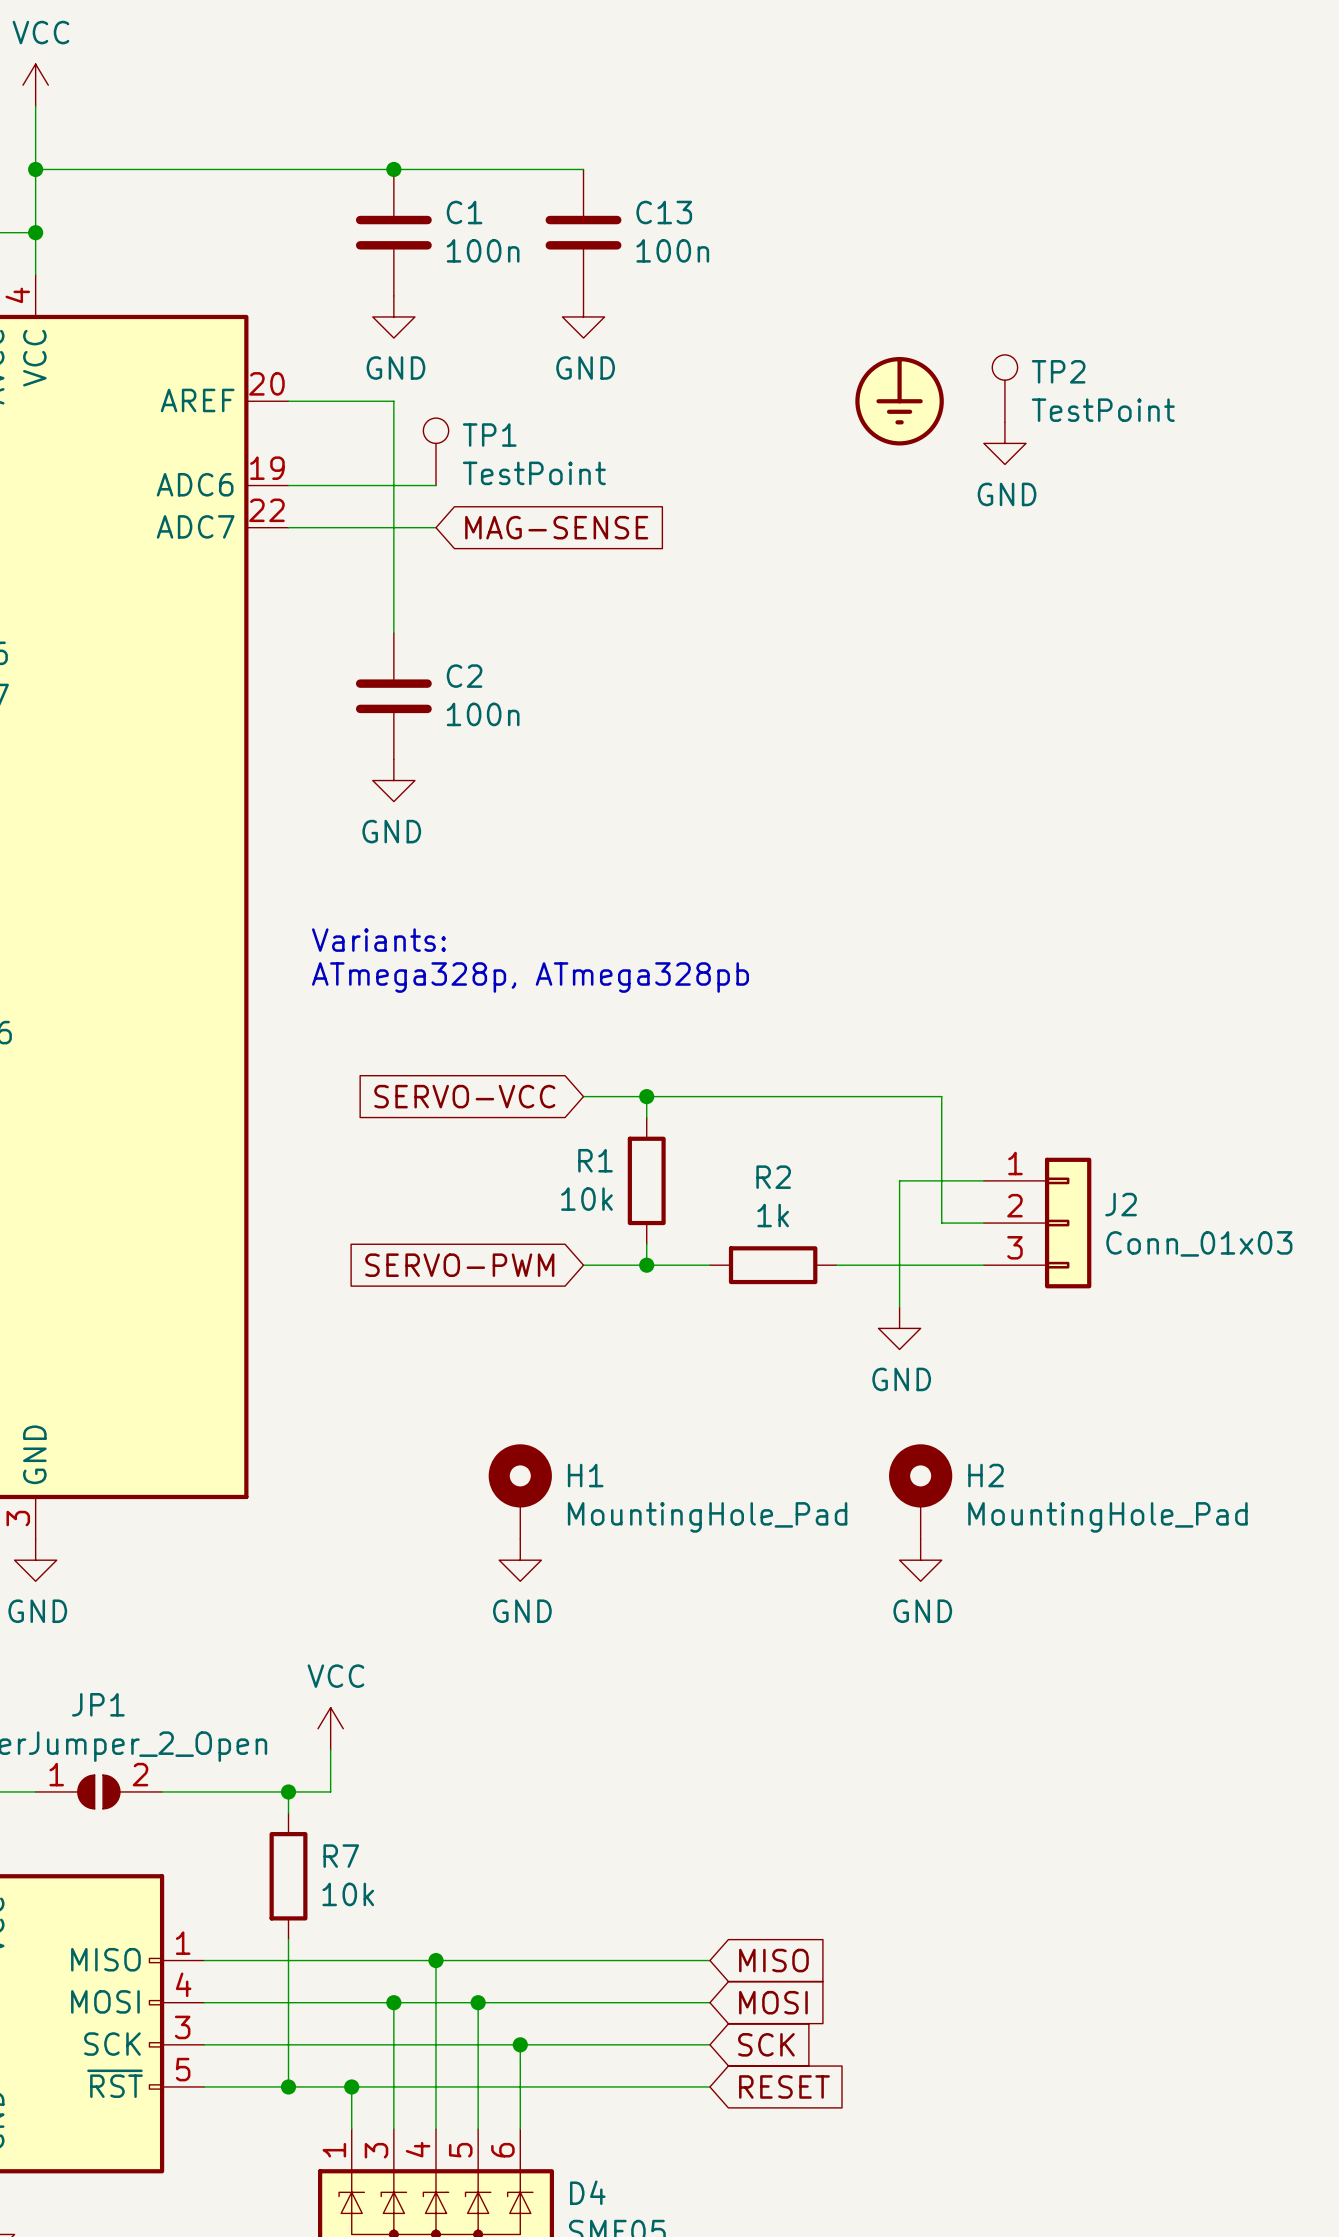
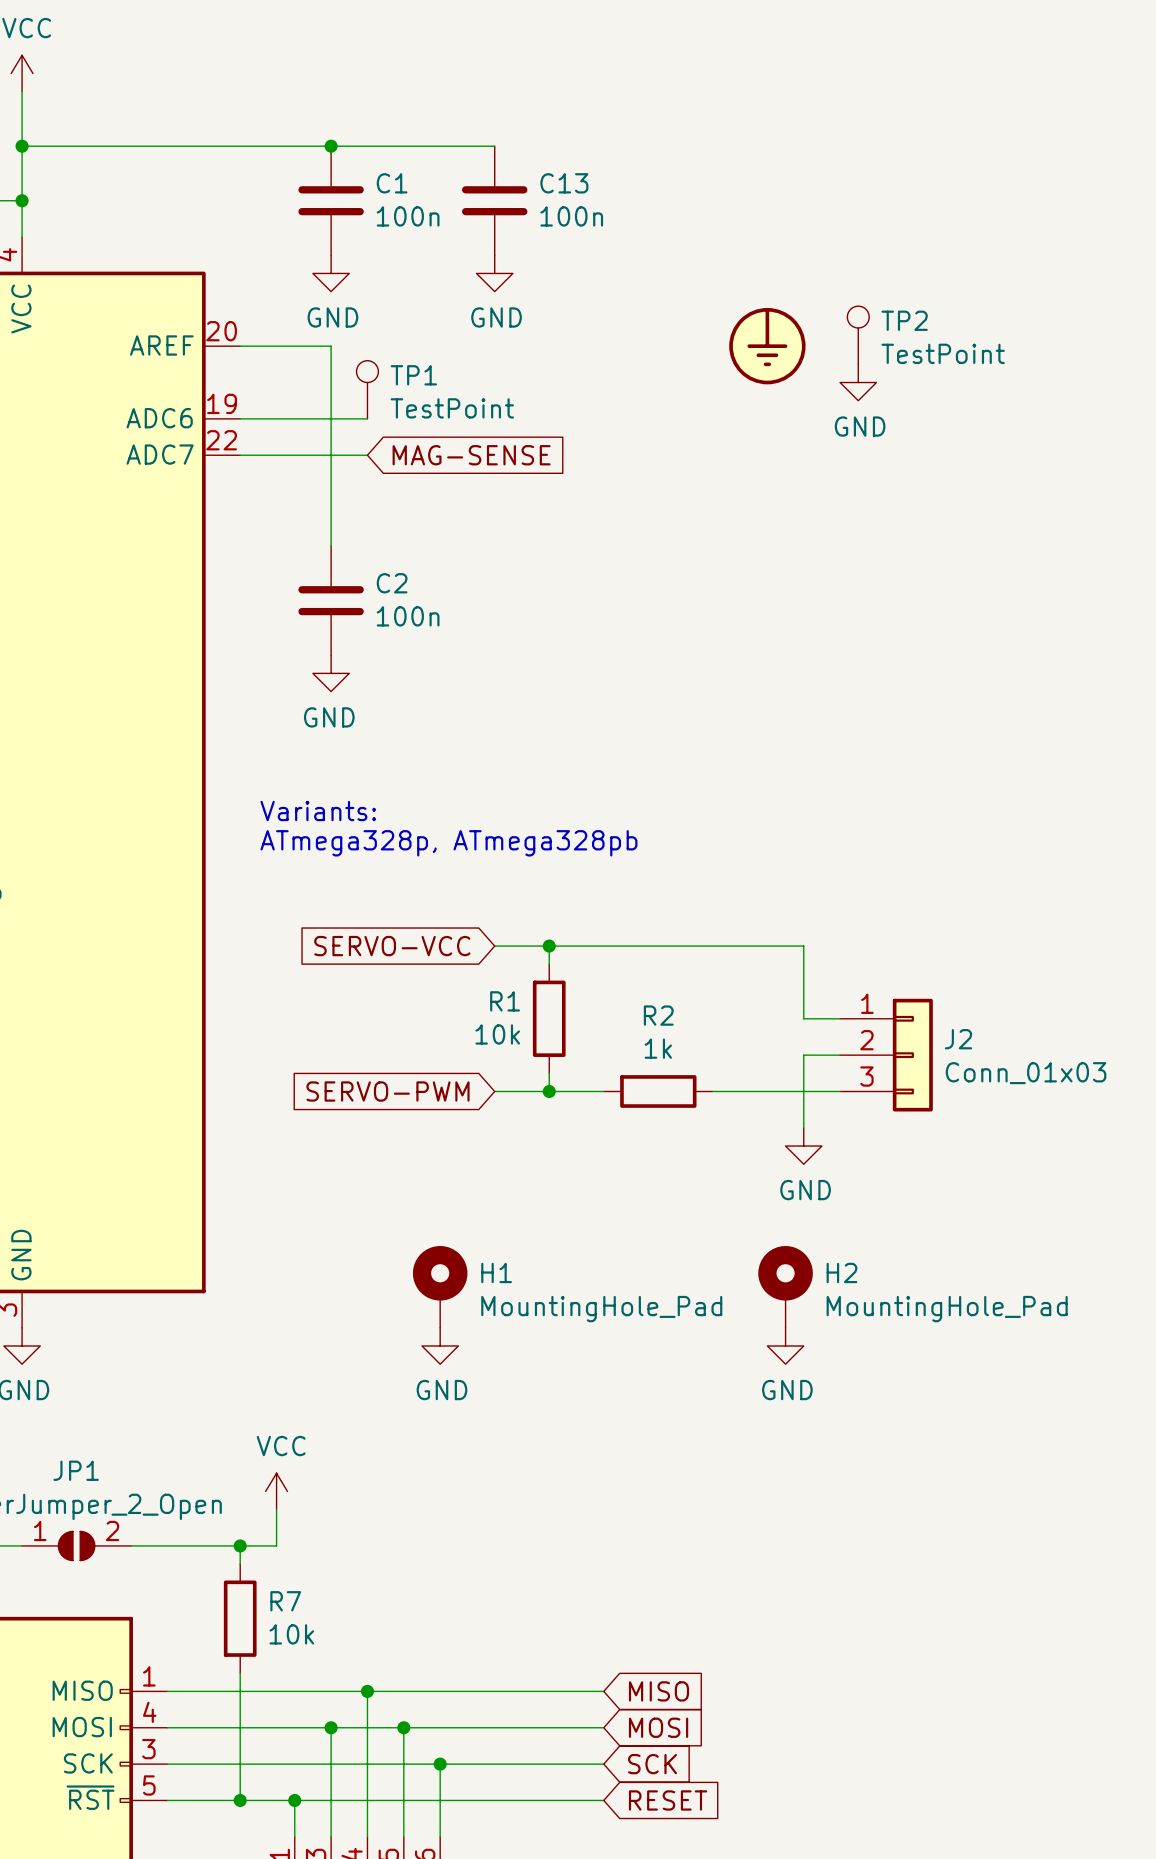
wire: (941, 1223) (941, 1180) (899, 1180) (899, 1307) -> (803, 1055) (803, 1127)
power symbol position: GND (899, 1328) -> GND (803, 1146)

